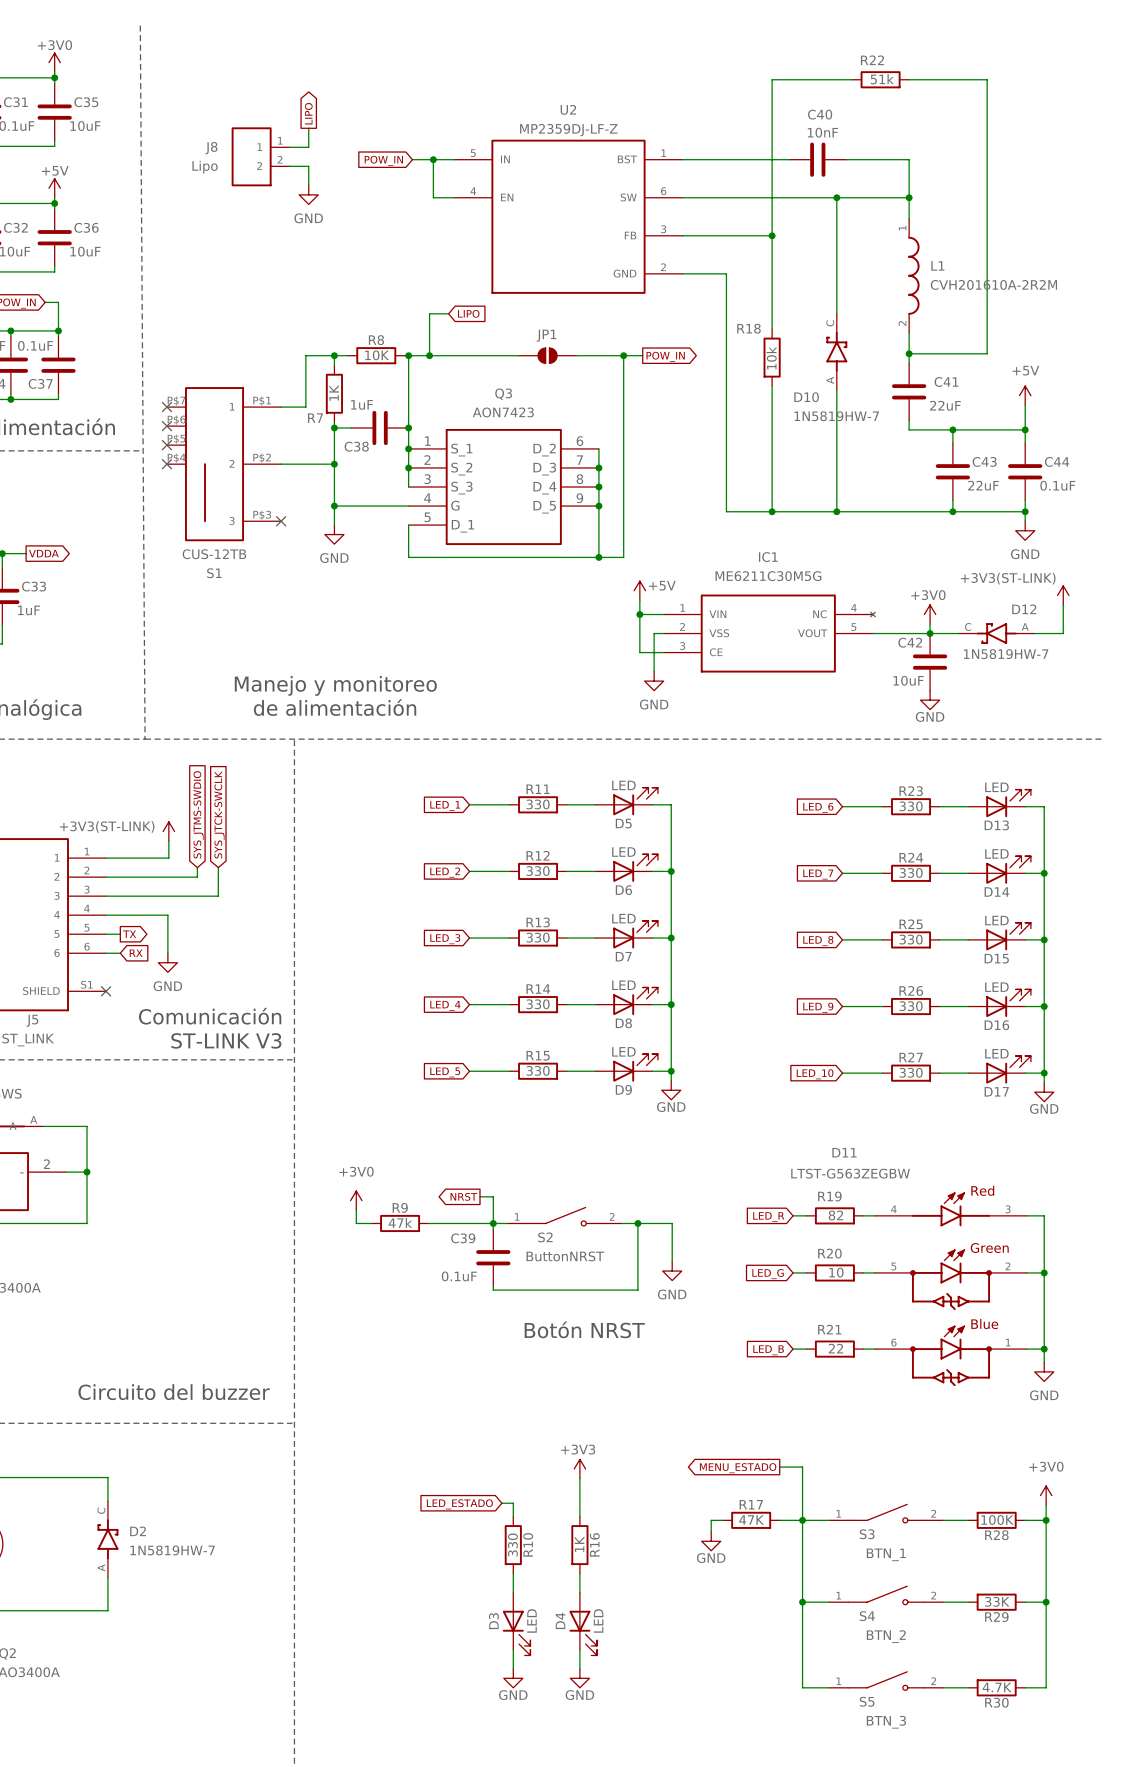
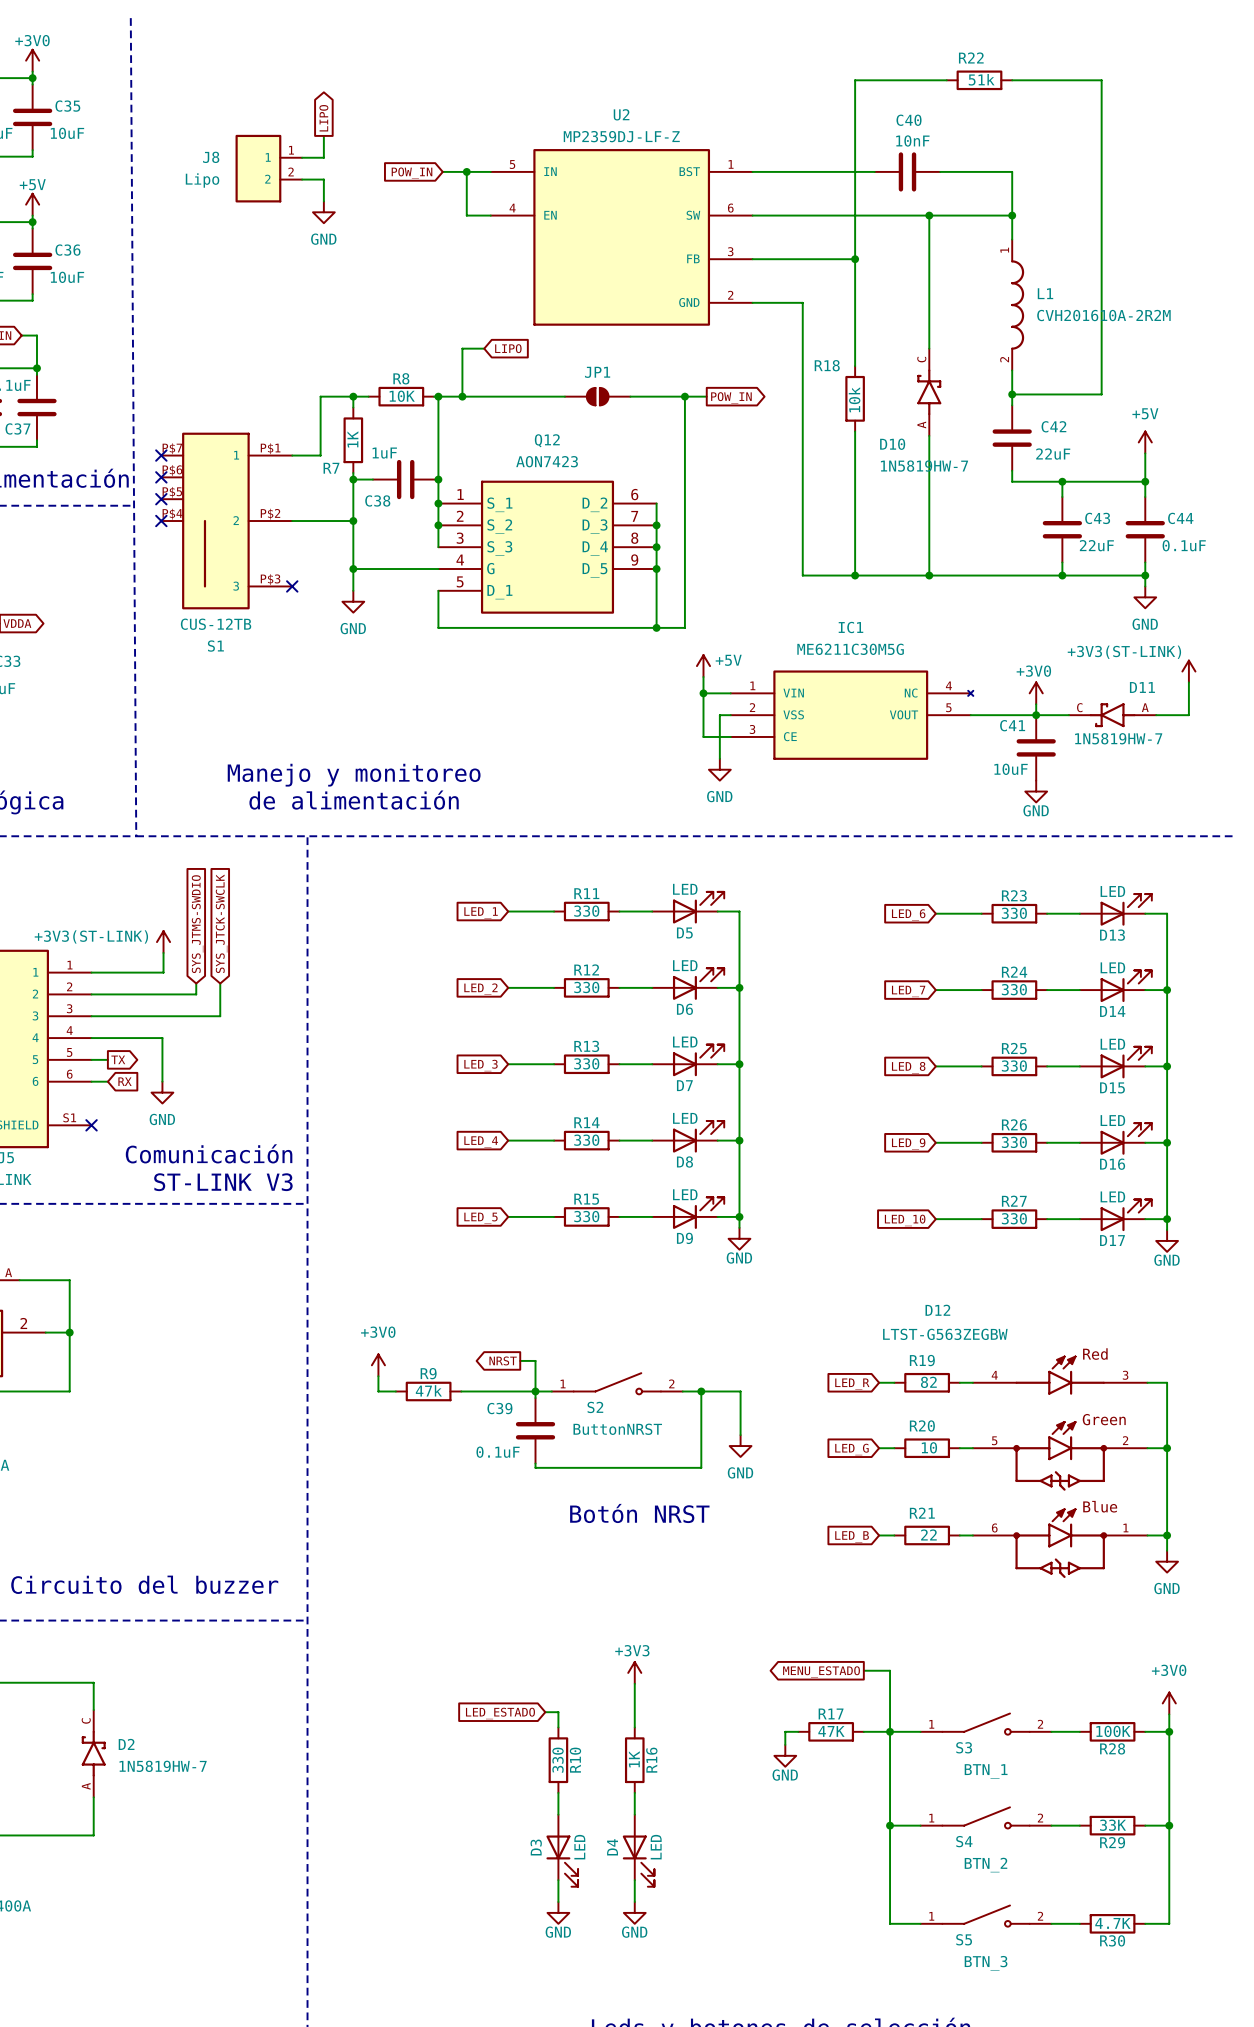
C41 name: C41 (946, 381) -> C42 (1053, 426)
Q3 name: Q3 (503, 394) -> Q12 (547, 440)
D12 name: D12 (1024, 609) -> D11 (1142, 687)
C42 name: C42 (910, 642) -> C41 (1012, 725)
D11 name: D11 (844, 1152) -> D12 (937, 1310)

